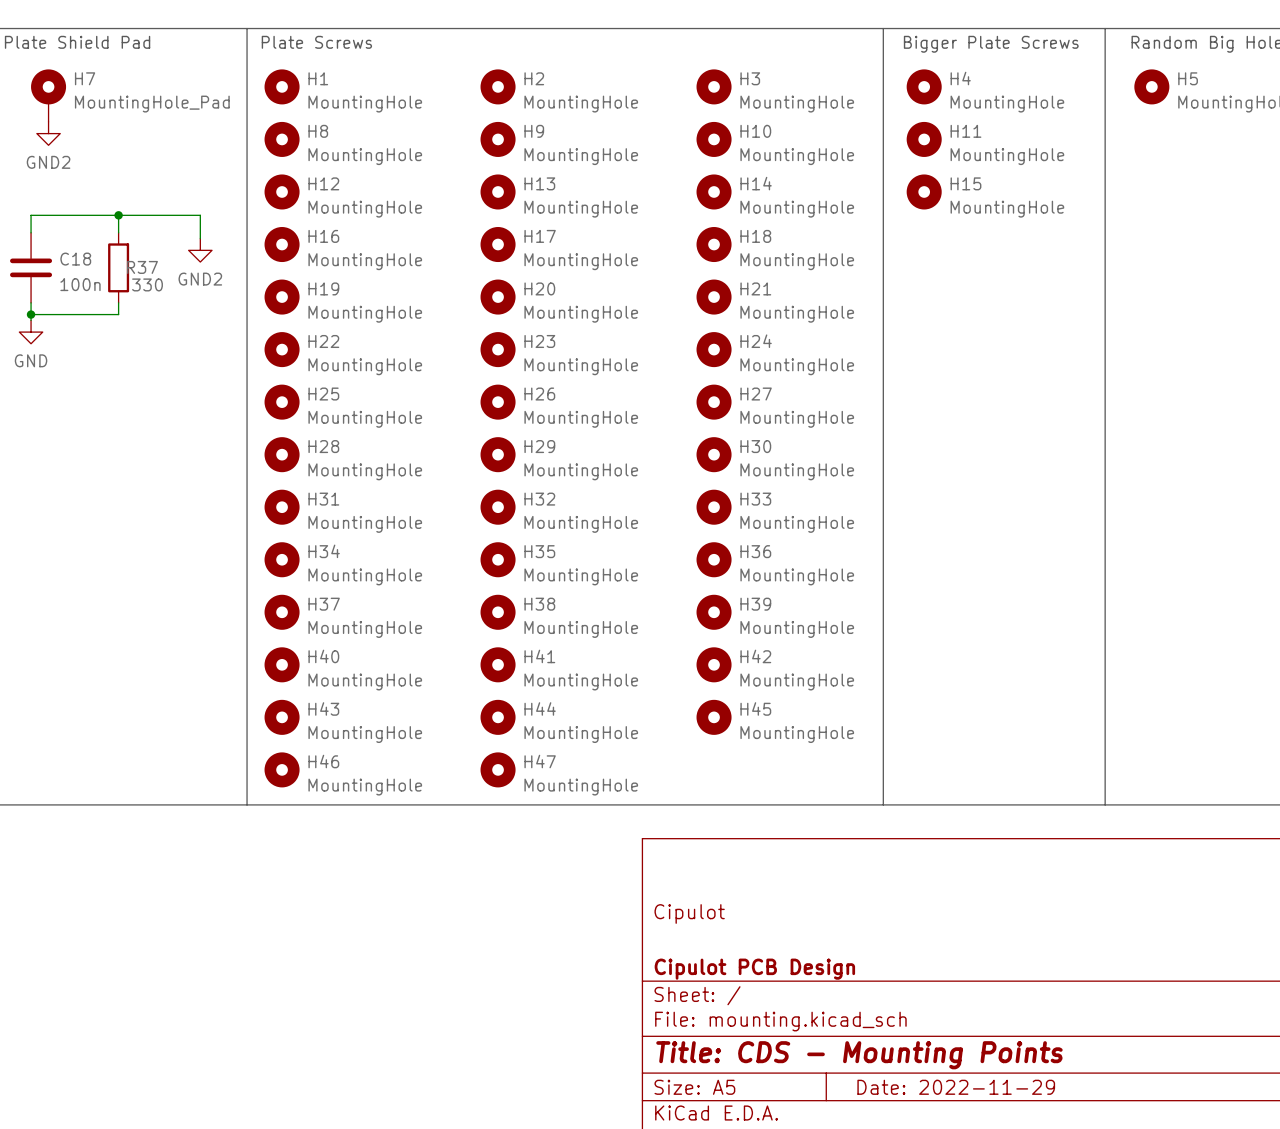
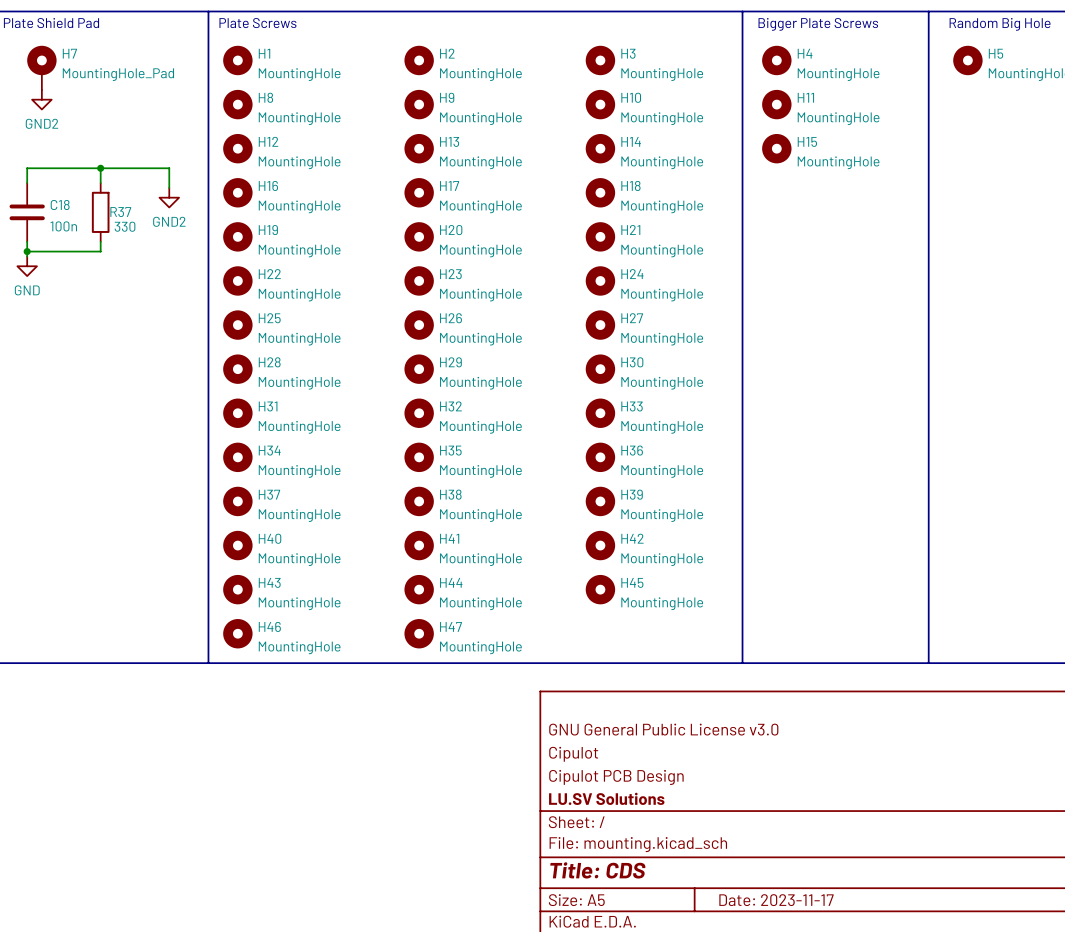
title block: none -> GNU General Public License v3.0 (663, 729)
title block: none -> Cipulot PCB Design (616, 777)
title block: Cipulot PCB Design (754, 969) -> LU.SV Solutions (606, 798)
title block: Title: CDS - Mounting Points (859, 1055) -> Title: CDS (597, 870)
title block: Date: 2022-11-29 (956, 1087) -> Date: 2023-11-17 (776, 900)

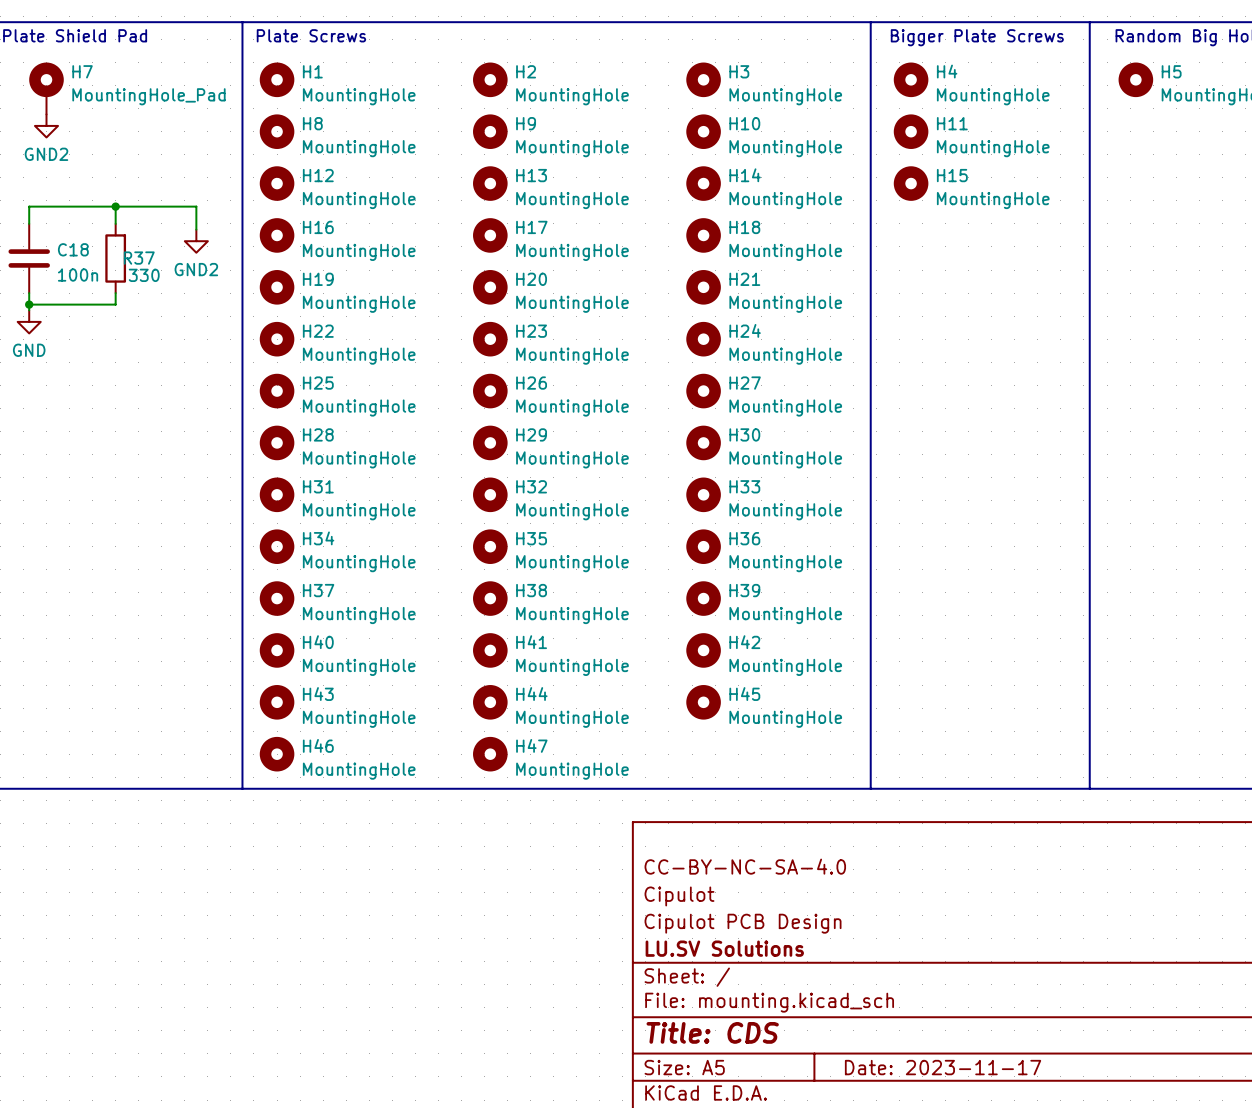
title block: GNU General Public License v3.0 (663, 729) -> CC-BY-NC-SA-4.0 (745, 866)

